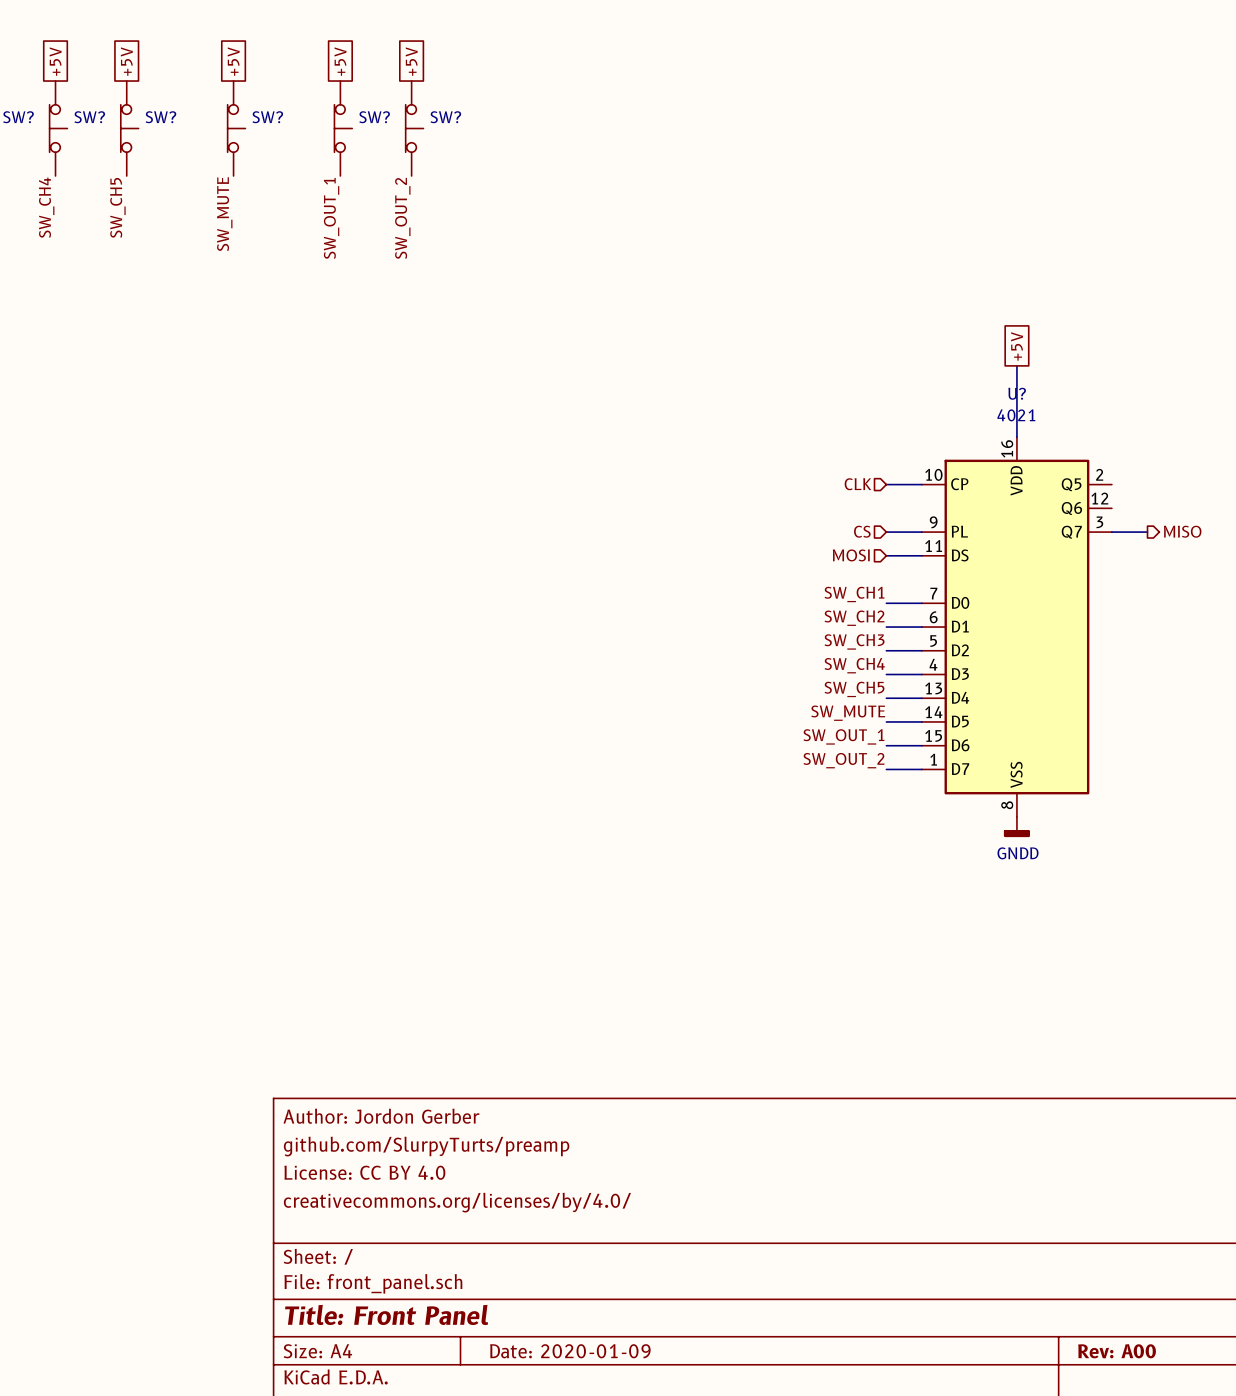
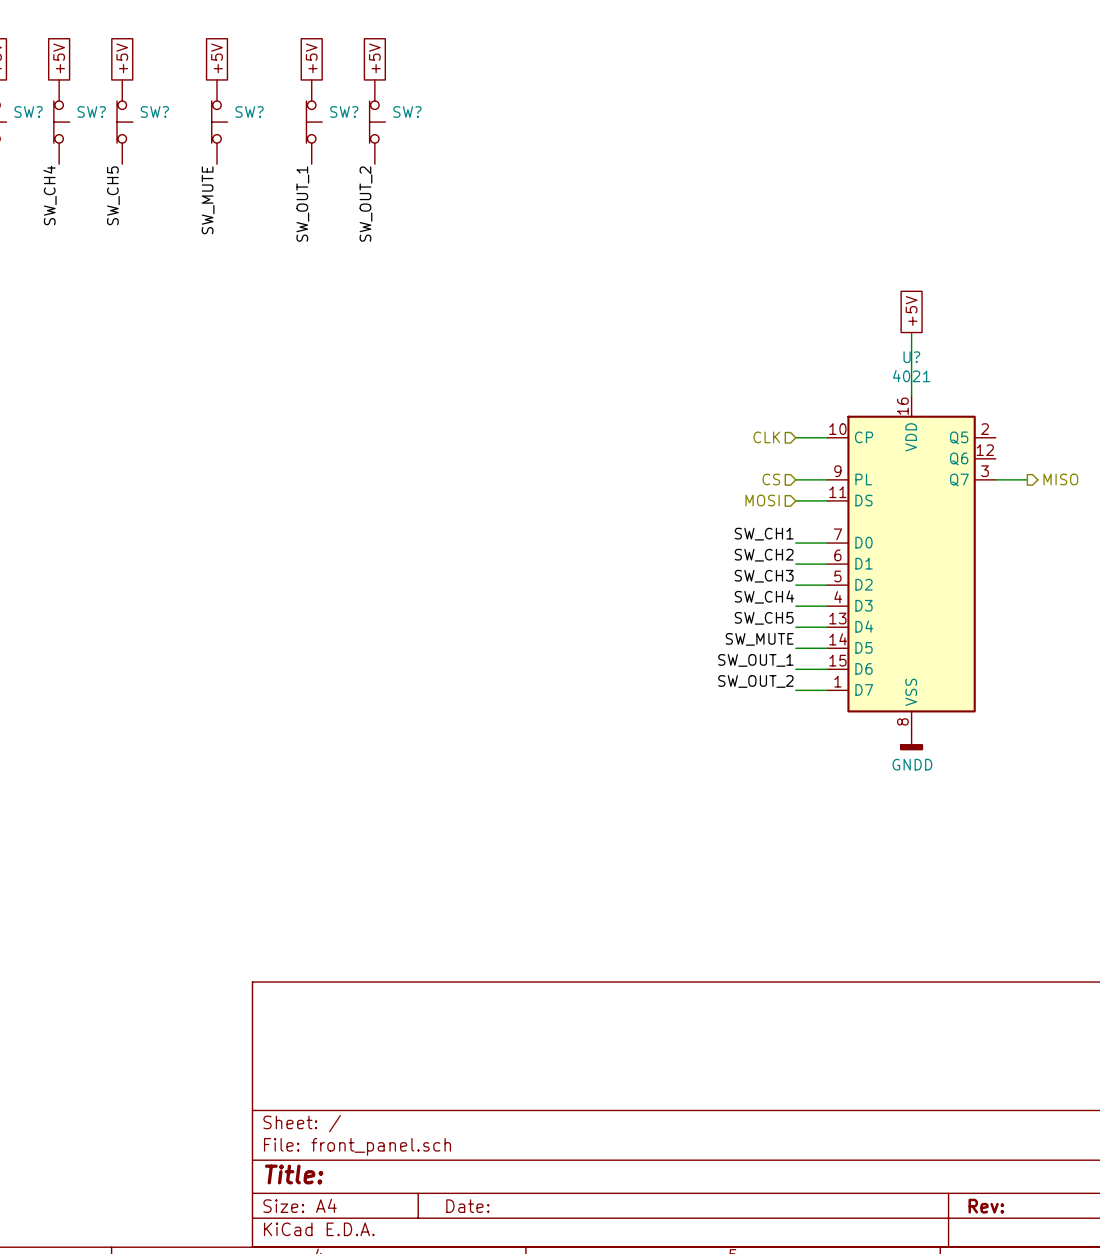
title block: Author: Jordon Gerber (381, 1116) -> none
title block: github.com/SlurpyTurts/preamp (426, 1146) -> none
title block: License: CC BY 4.0 (364, 1172) -> none
title block: creativecommons.org/licenses/by/4.0/ (457, 1202) -> none
title block: Title: Front Panel (386, 1314) -> Title: (294, 1174)
title block: Date: 2020-01-09 (570, 1351) -> Date: (467, 1206)
title block: Rev: A00 (1117, 1351) -> Rev: (986, 1206)

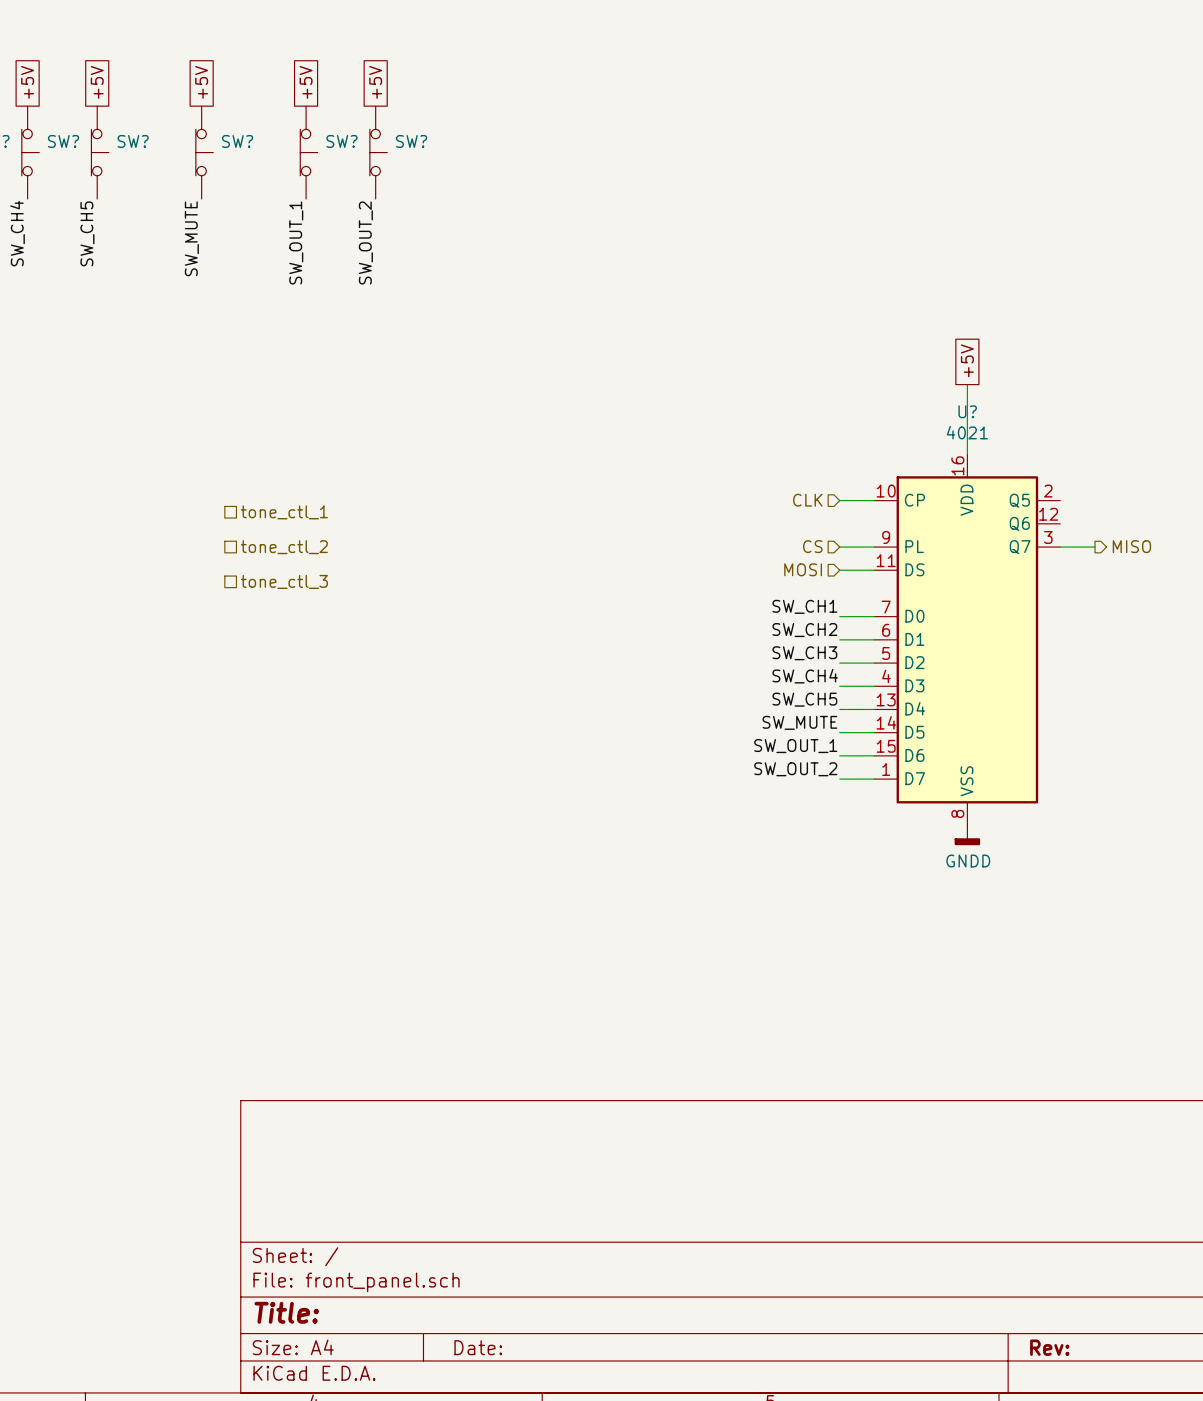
hierarchical label: none -> tone_ctl_1 (284, 512)
hierarchical label: none -> tone_ctl_2 (284, 547)
hierarchical label: none -> tone_ctl_3 (284, 581)

